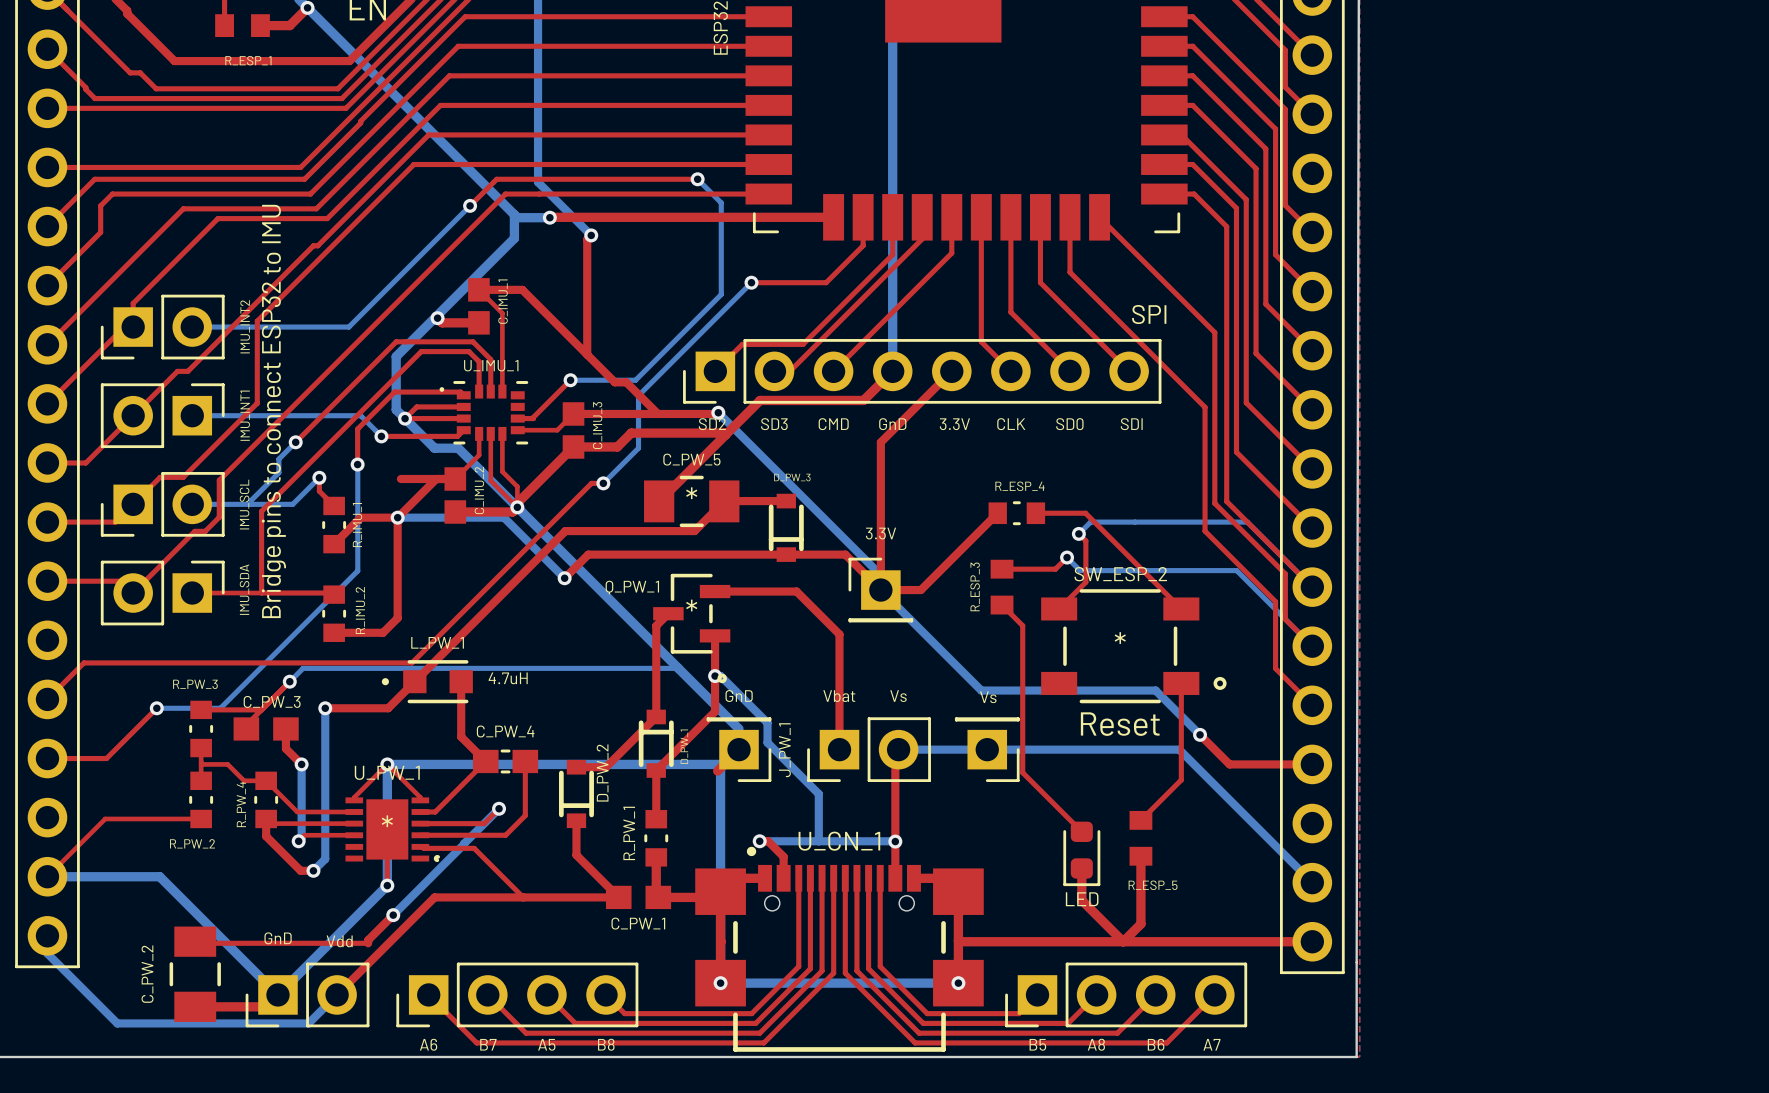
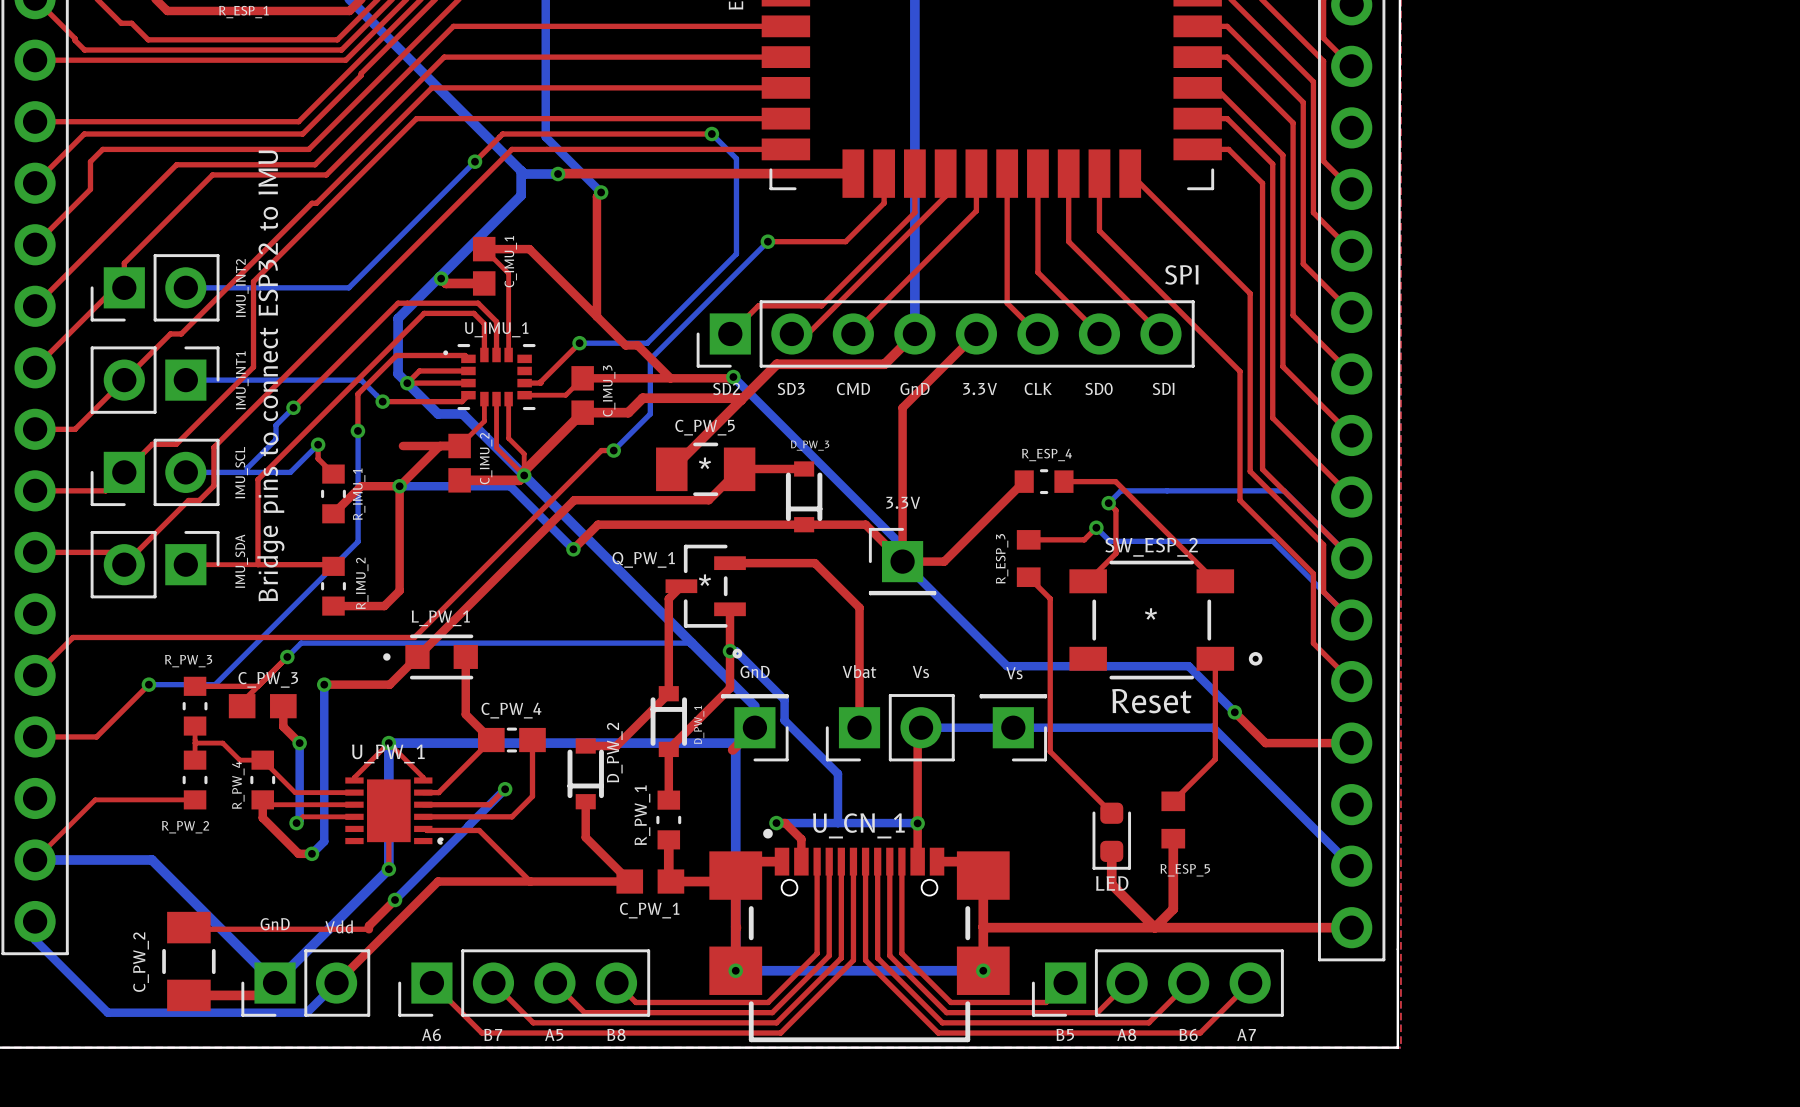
L_PW_1 value: 4.7uH (508, 678) -> none
J_PW_1 name: J_PW_1 (784, 750) -> none
U_PW_1 text: * (387, 821) -> none

